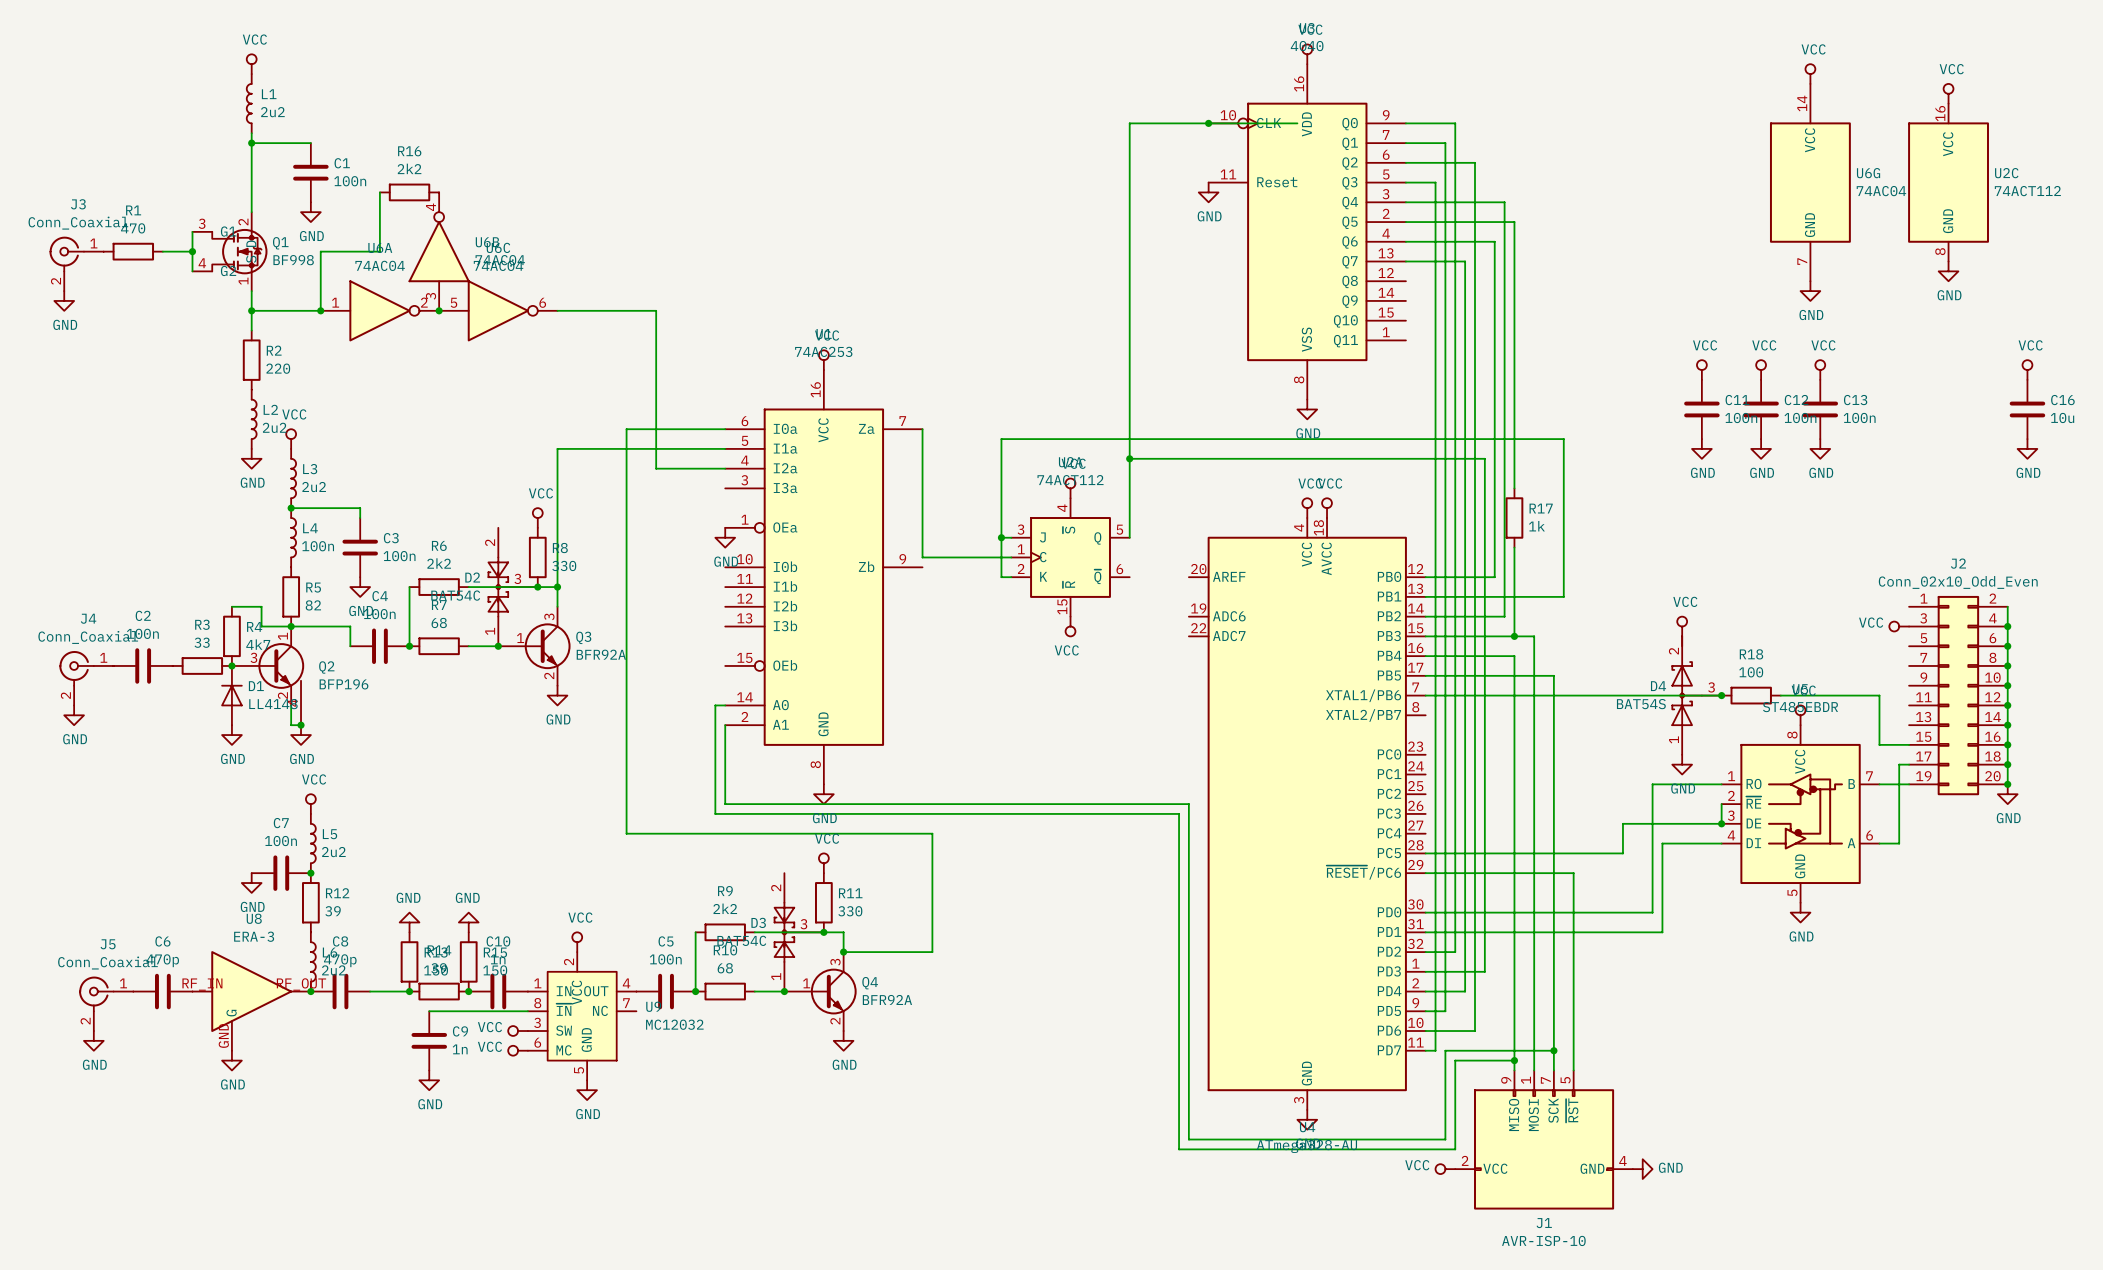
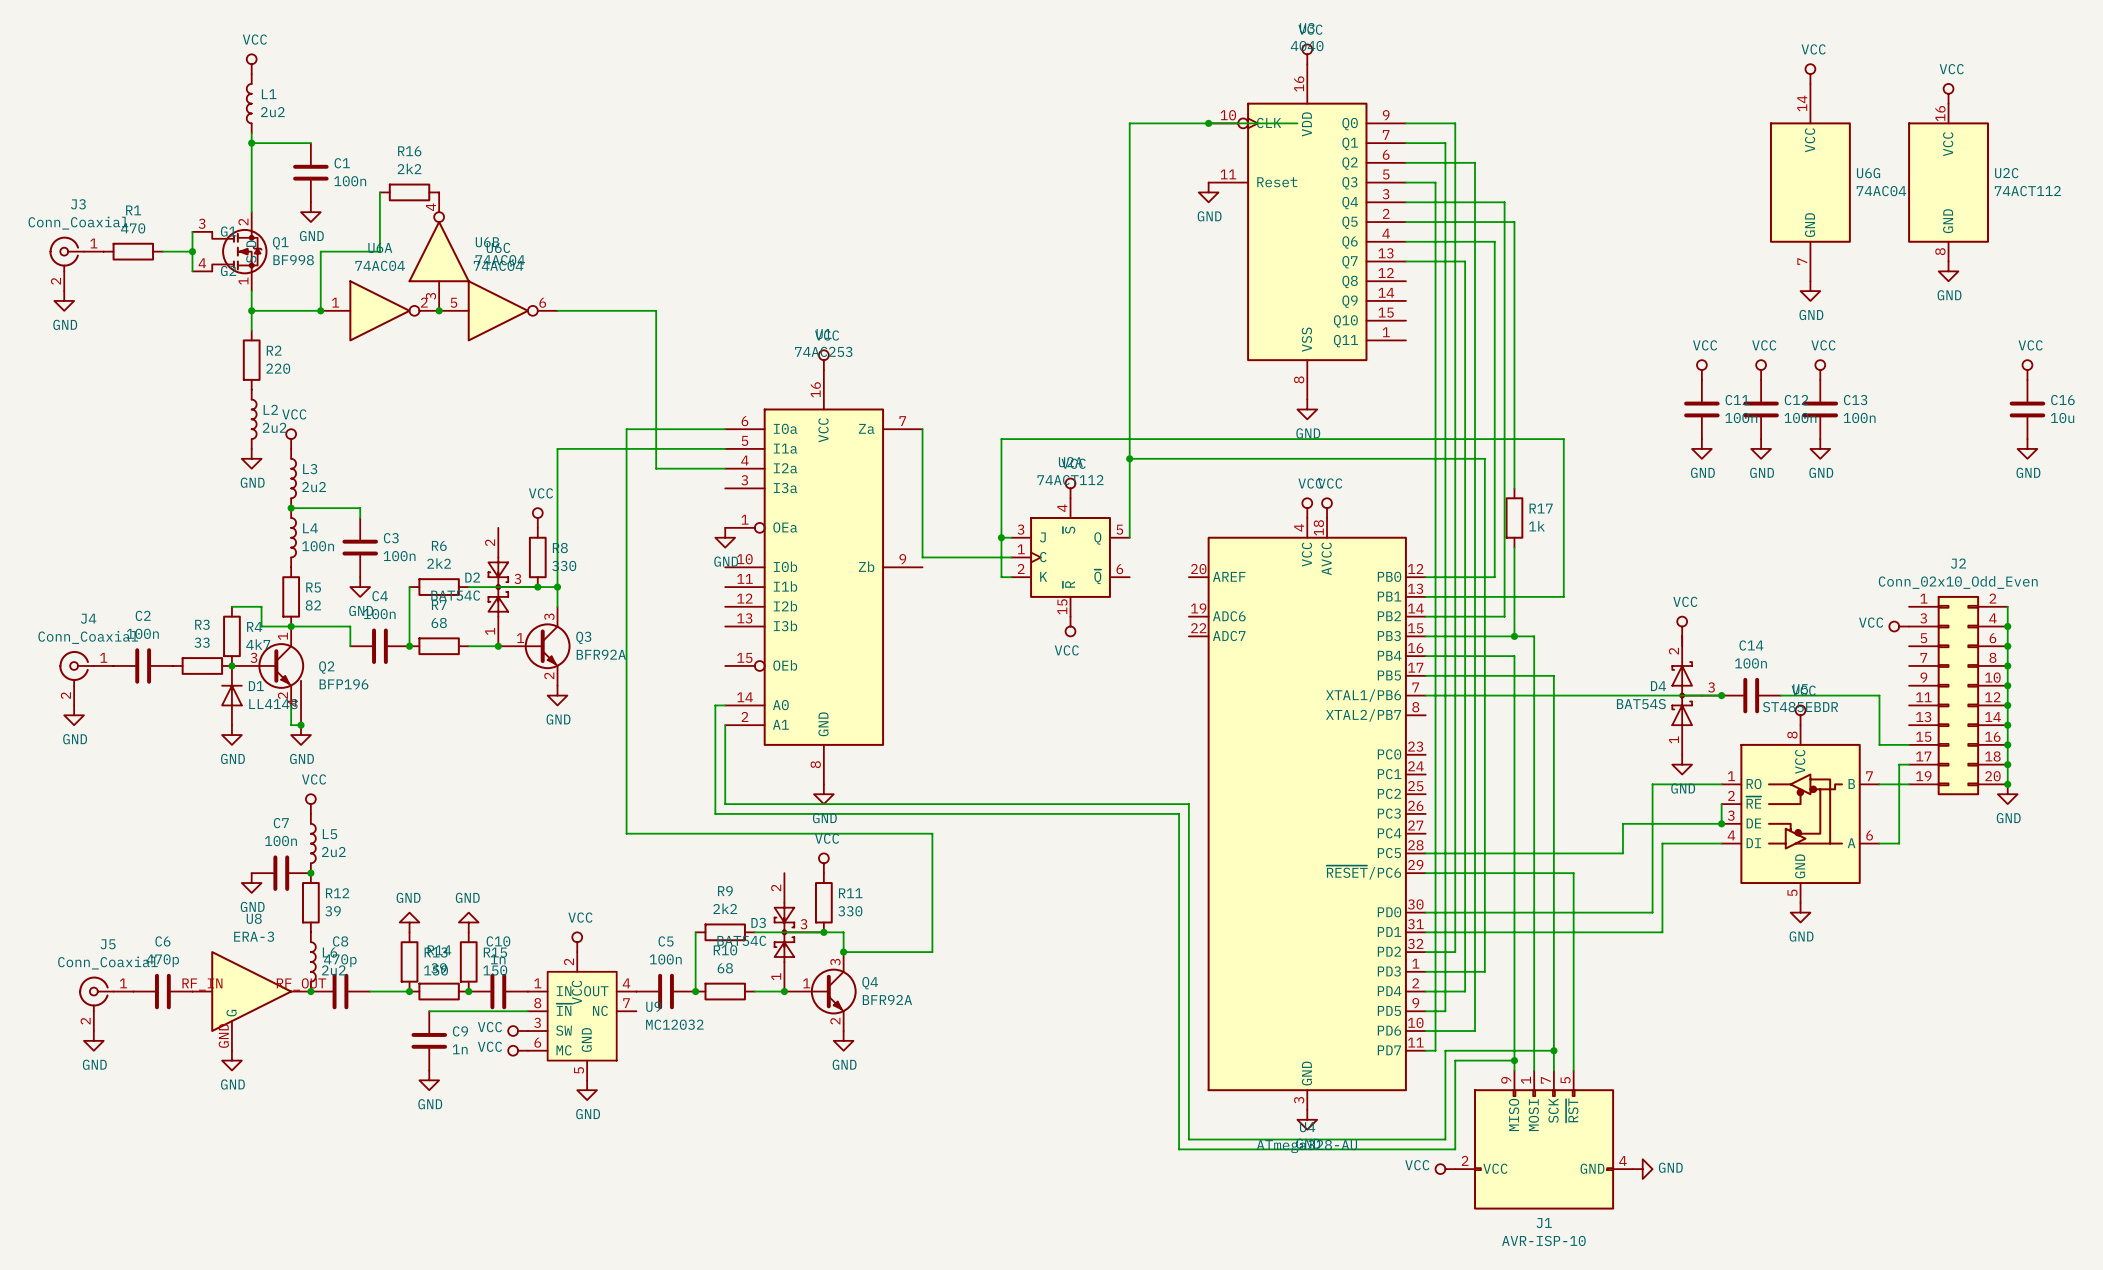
R18: 100 (1751, 695) -> none
C14: none -> 100n (1751, 695)

